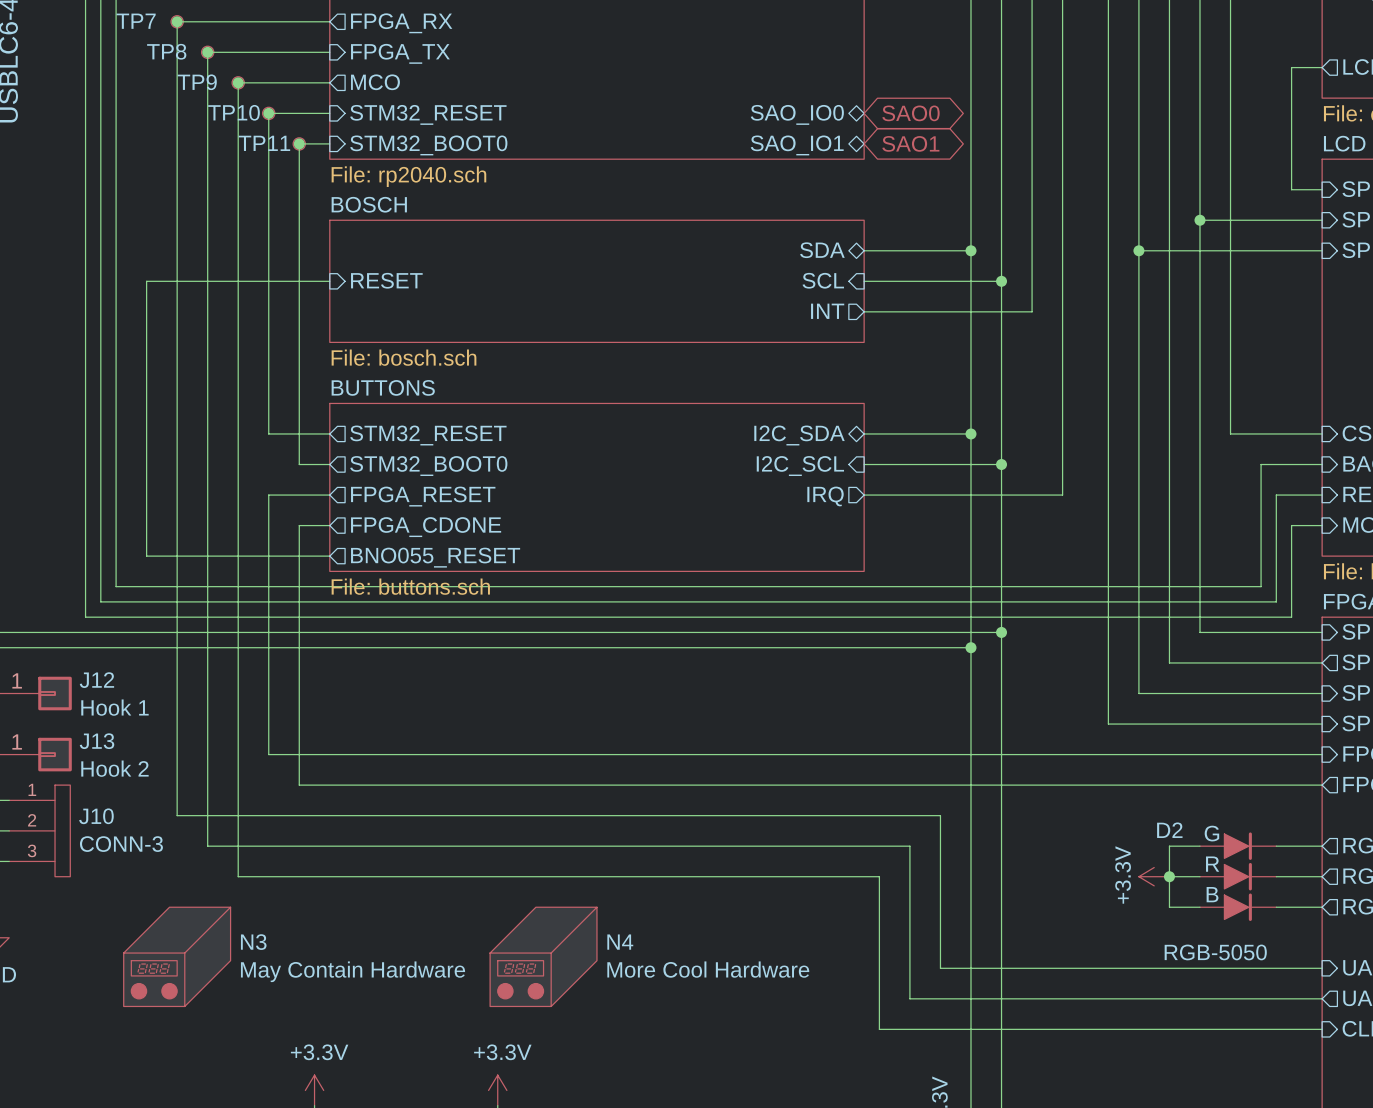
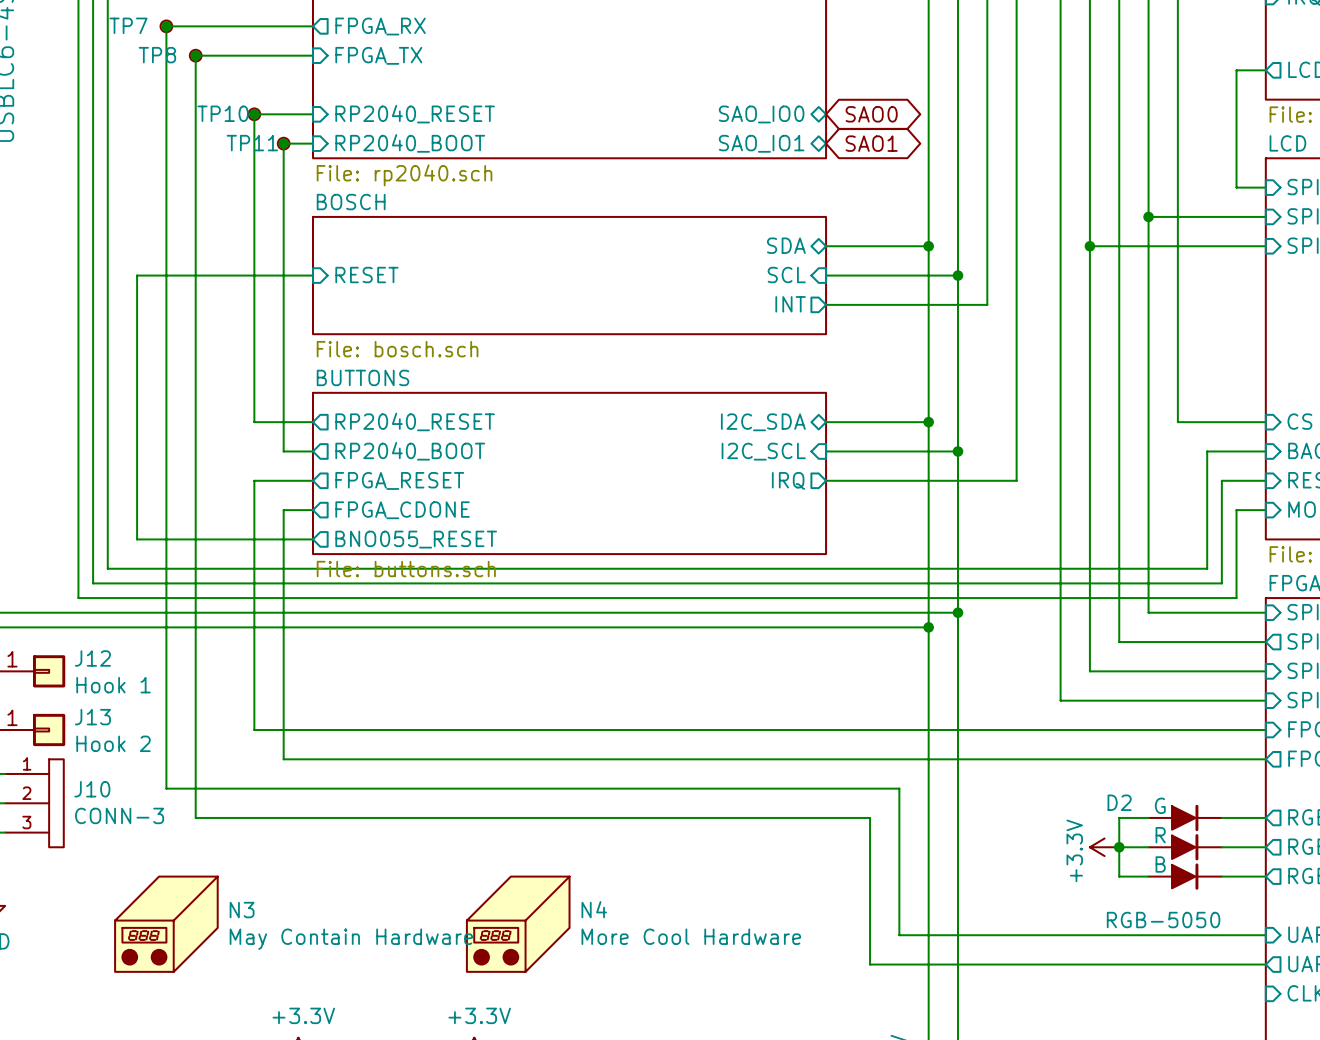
TP9: (238, 82) -> none
junction: (238, 82) -> none
wire: (329, 82) (238, 82) (238, 876) (879, 876) (879, 1029) (1322, 1029) -> none
sheet pin: MCO (375, 82) -> none
sheet pin: STM32_RESET (428, 114) -> RP2040_RESET (415, 114)
sheet pin: STM32_BOOT0 (428, 145) -> RP2040_BOOT (410, 143)
sheet pin: STM32_RESET (428, 435) -> RP2040_RESET (415, 421)
sheet pin: STM32_BOOT0 (428, 466) -> RP2040_BOOT (410, 451)

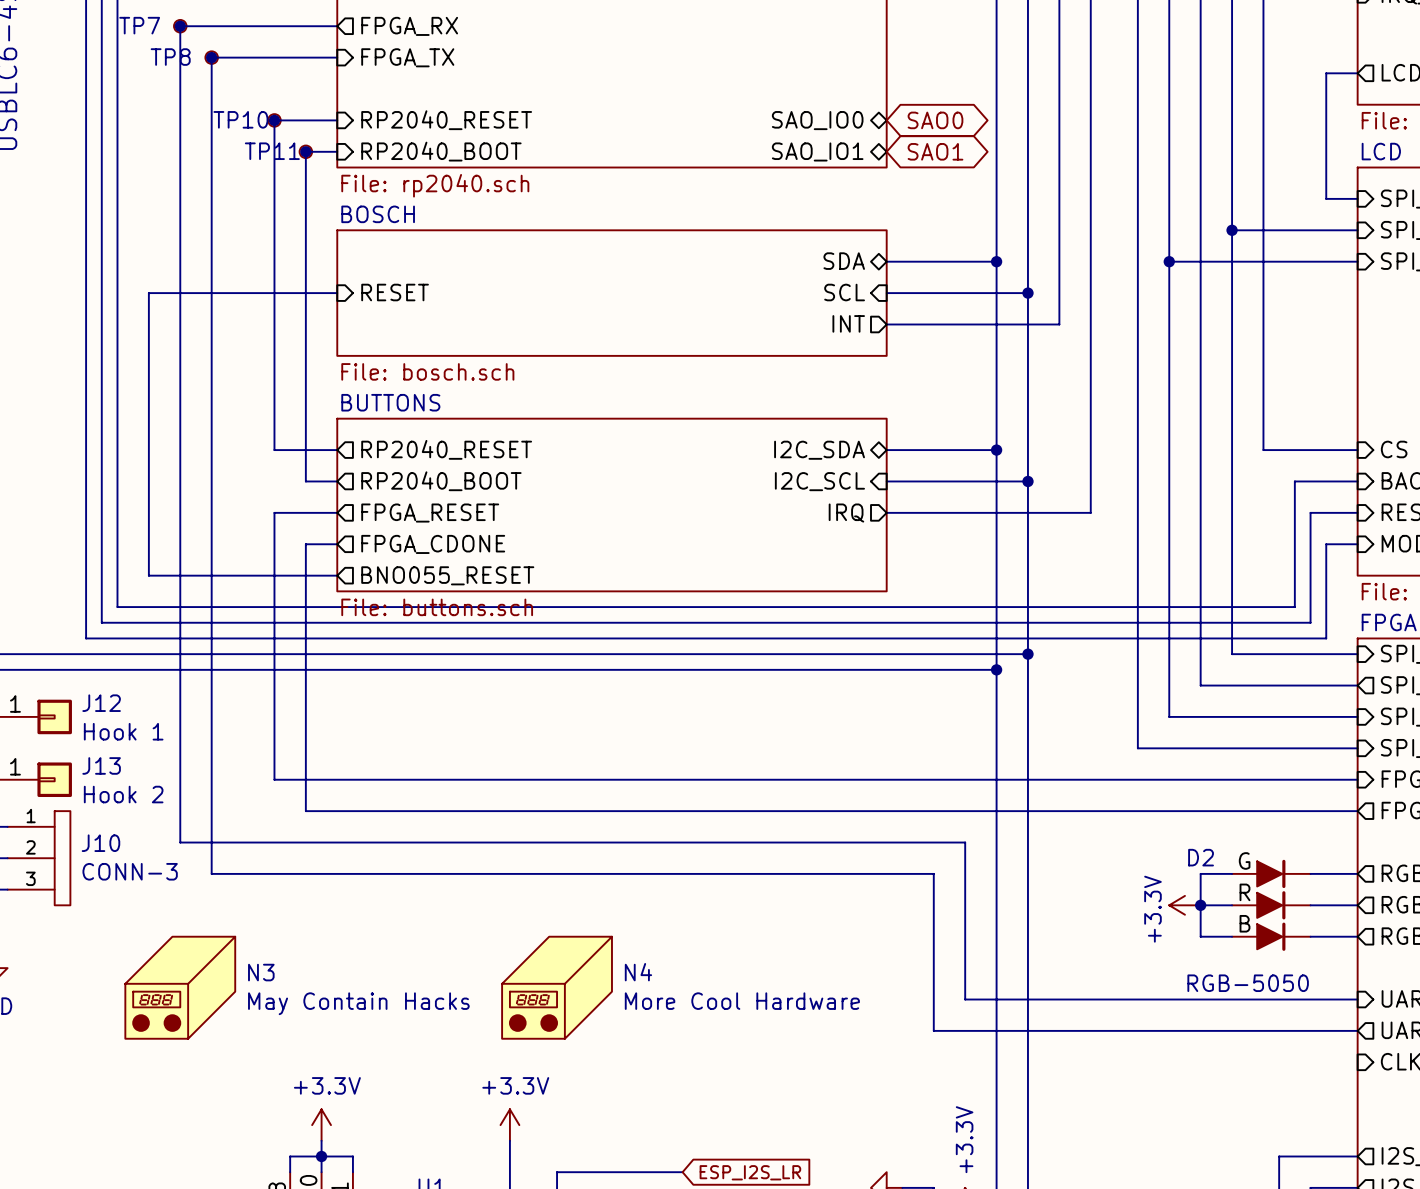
N3 value: May Contain Hardware (351, 939) -> May Contain Hacks (358, 1003)

